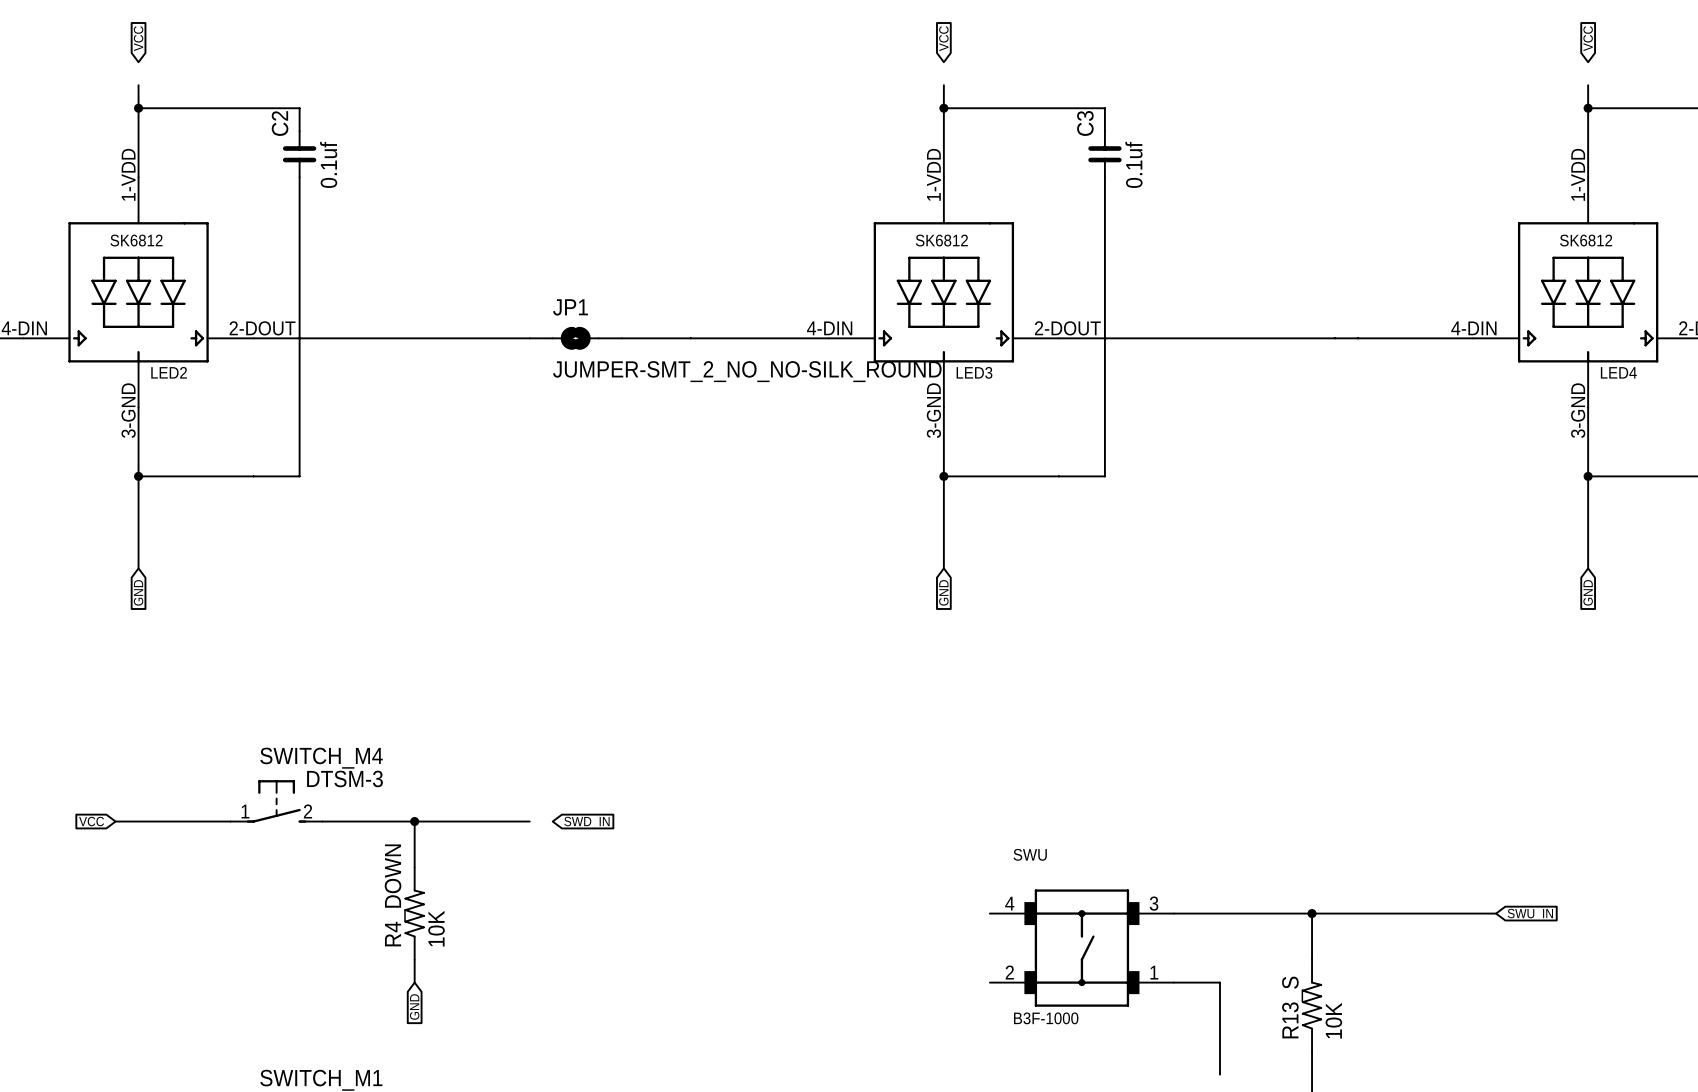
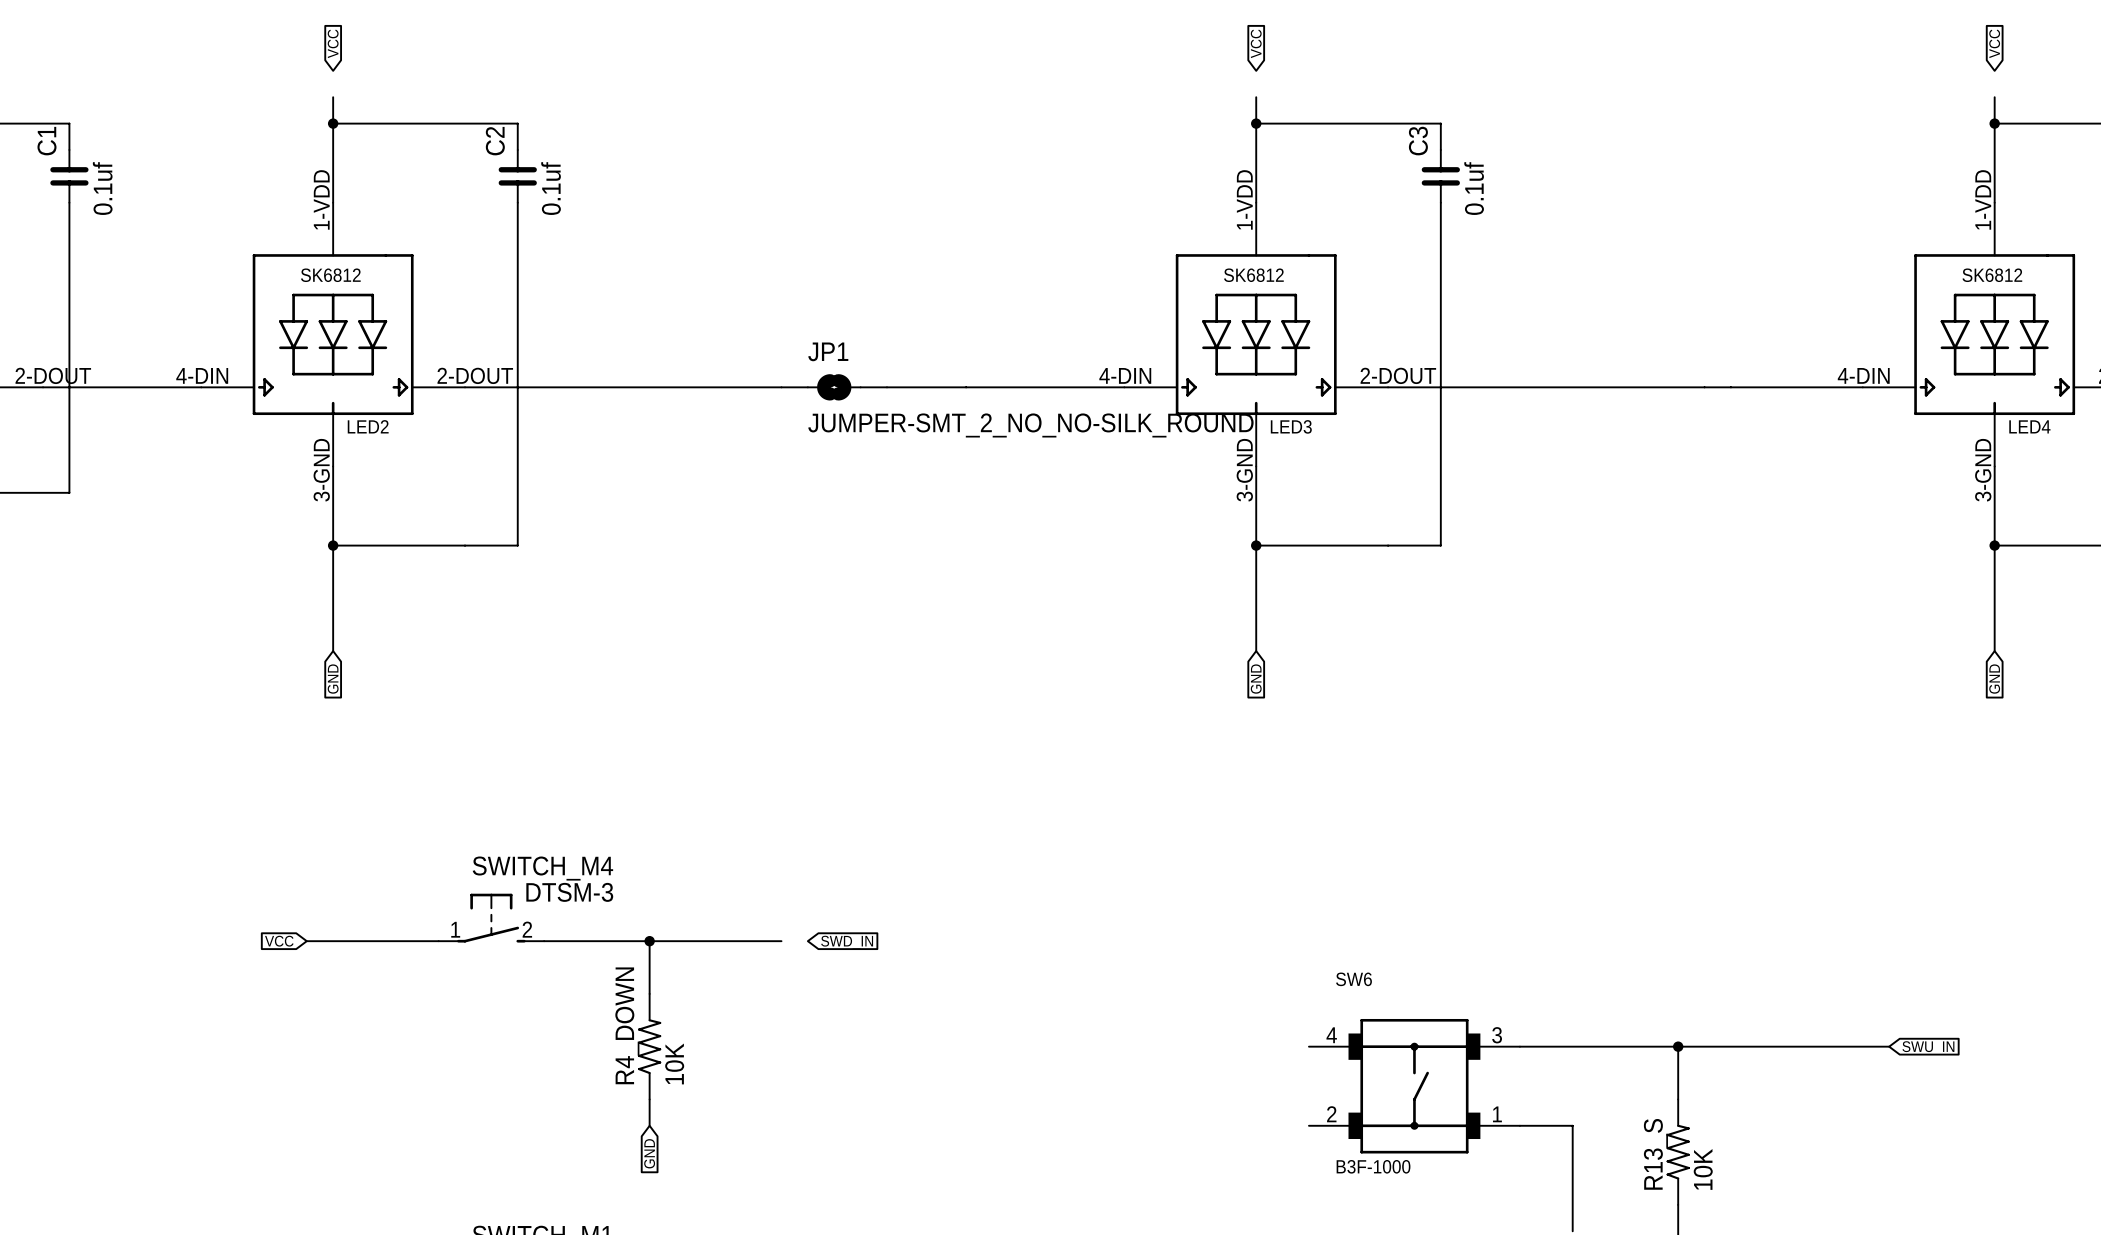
SWU name: SWU (1030, 854) -> SW6 (1353, 979)

